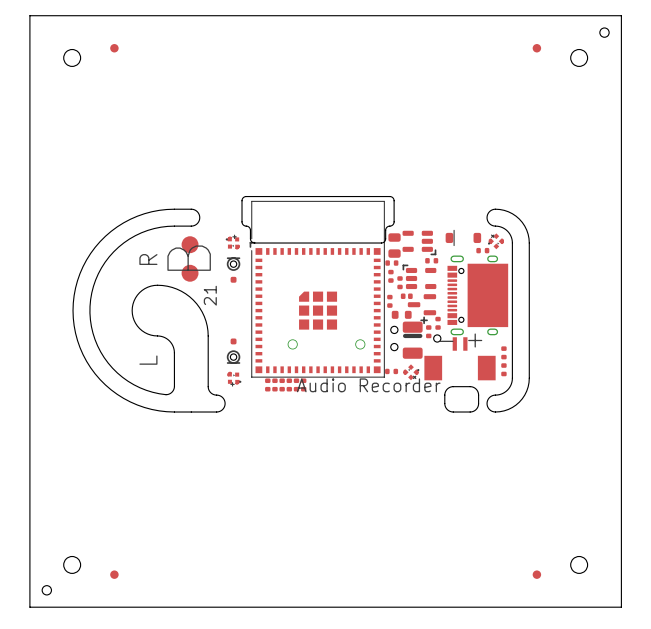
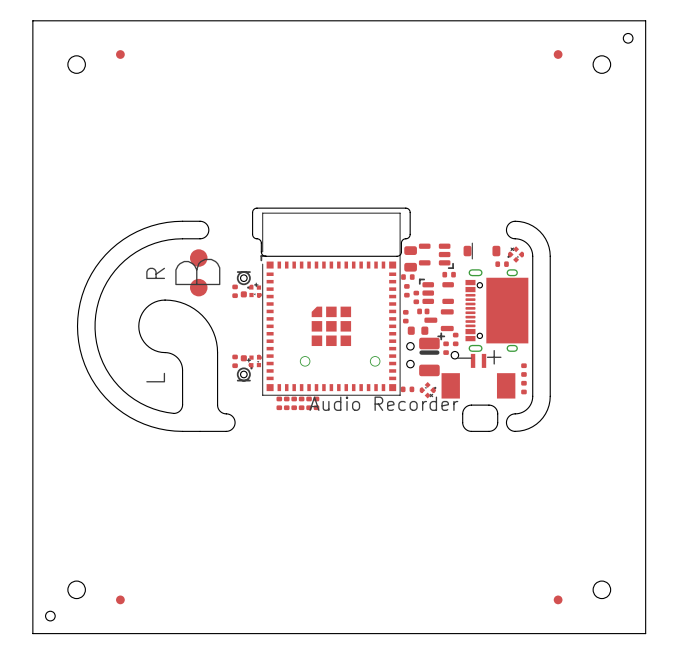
part position: (232, 242) -> (254, 290)
part: none -> (235, 291)
text: 21 (210, 295) -> none
part: none -> (235, 361)
part rotation: 0° (234, 379) -> 90° clockwise (254, 362)
part position: (234, 379) -> (254, 362)

